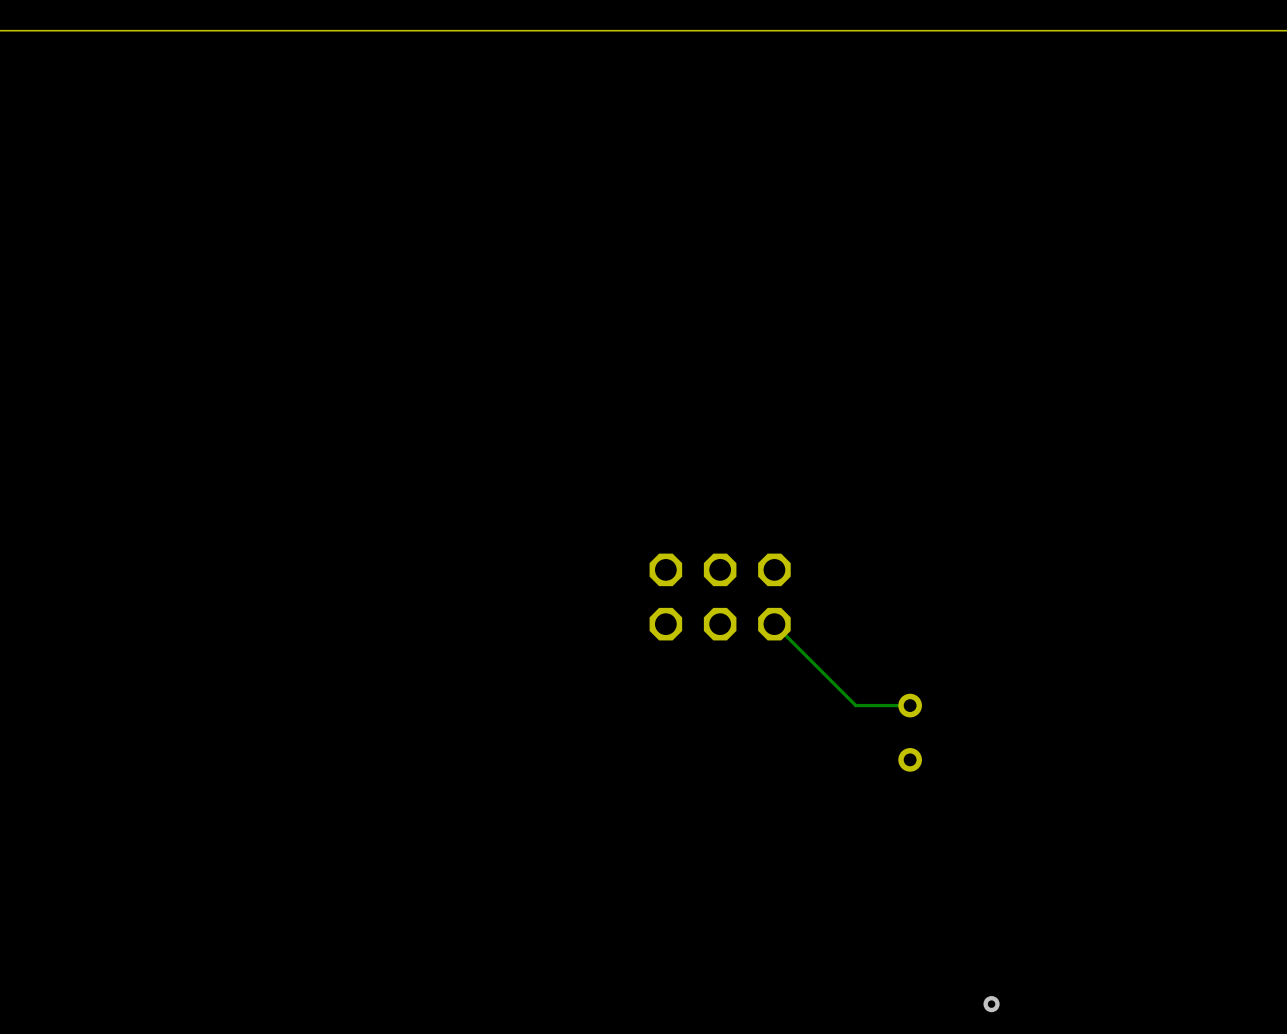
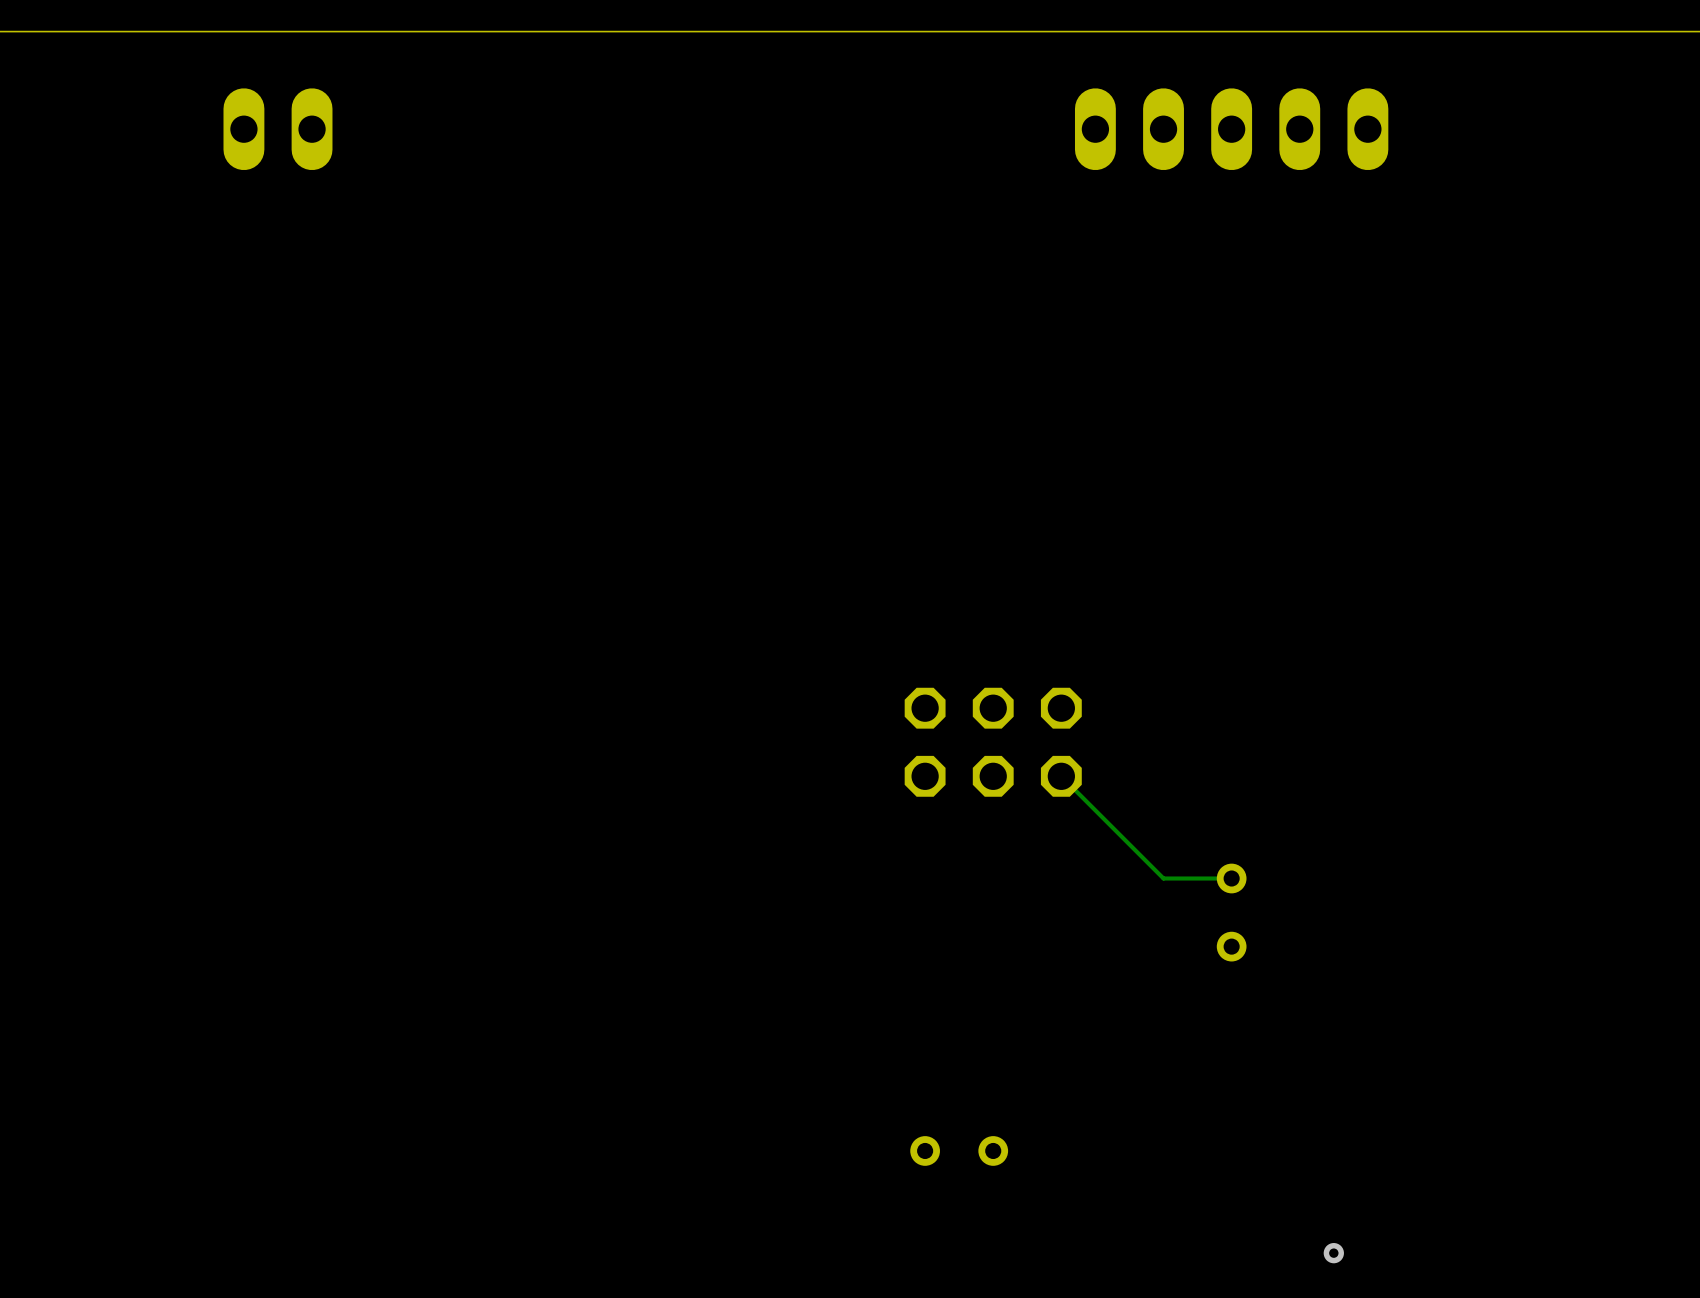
part: none -> (277, 129)
part: none -> (1231, 129)
part: none -> (959, 1150)

